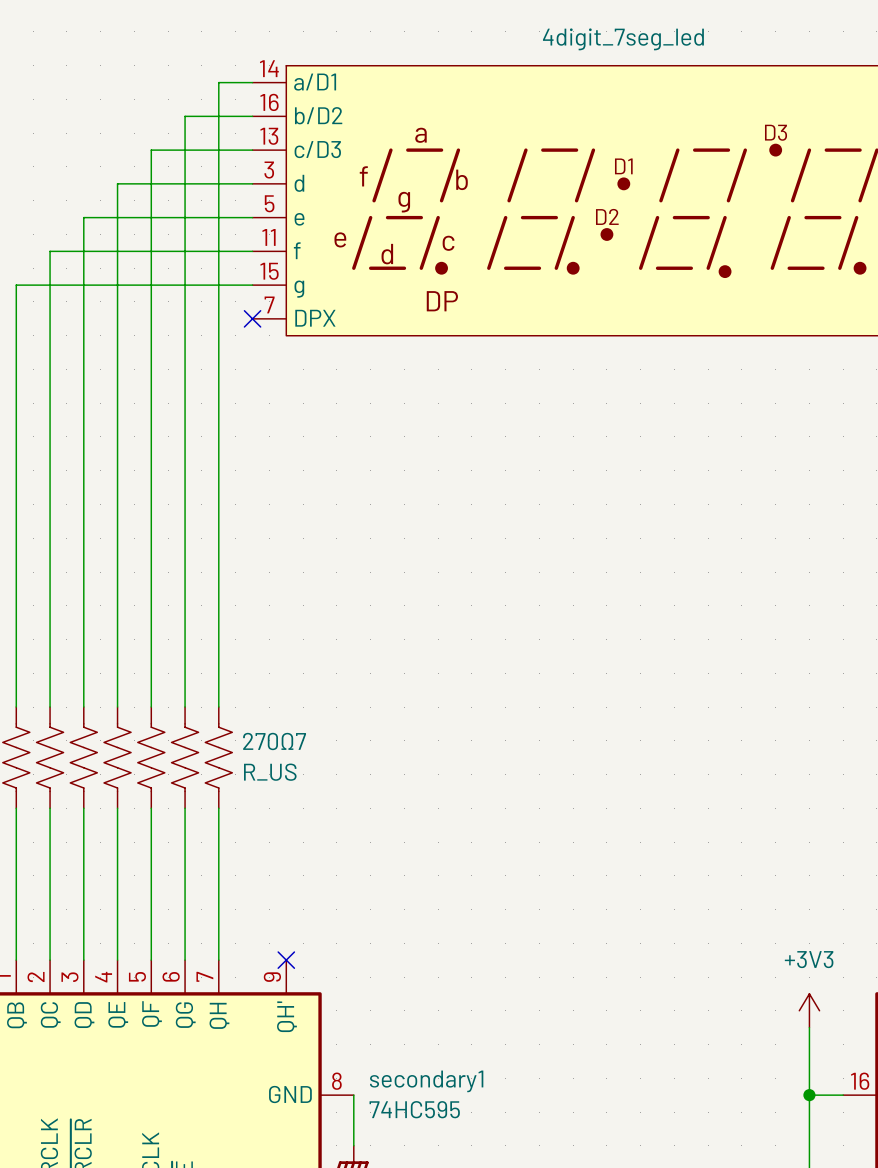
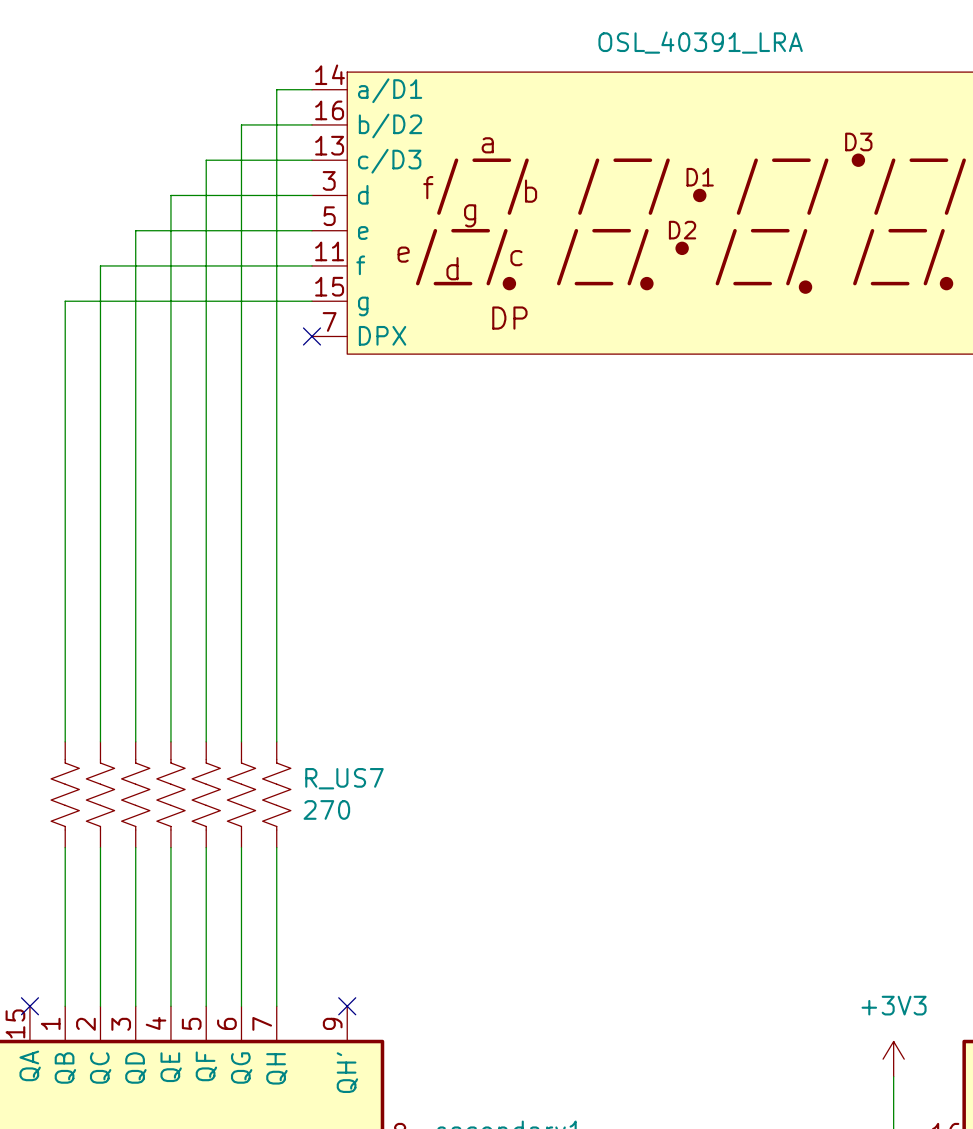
part value: 4digit_7seg_led (623, 39) -> OSL_40391_LRA (700, 42)
270Ω7 name: 270Ω7 (274, 741) -> R_US7 (344, 778)
270Ω7 value: R_US (270, 772) -> 270 (326, 809)

